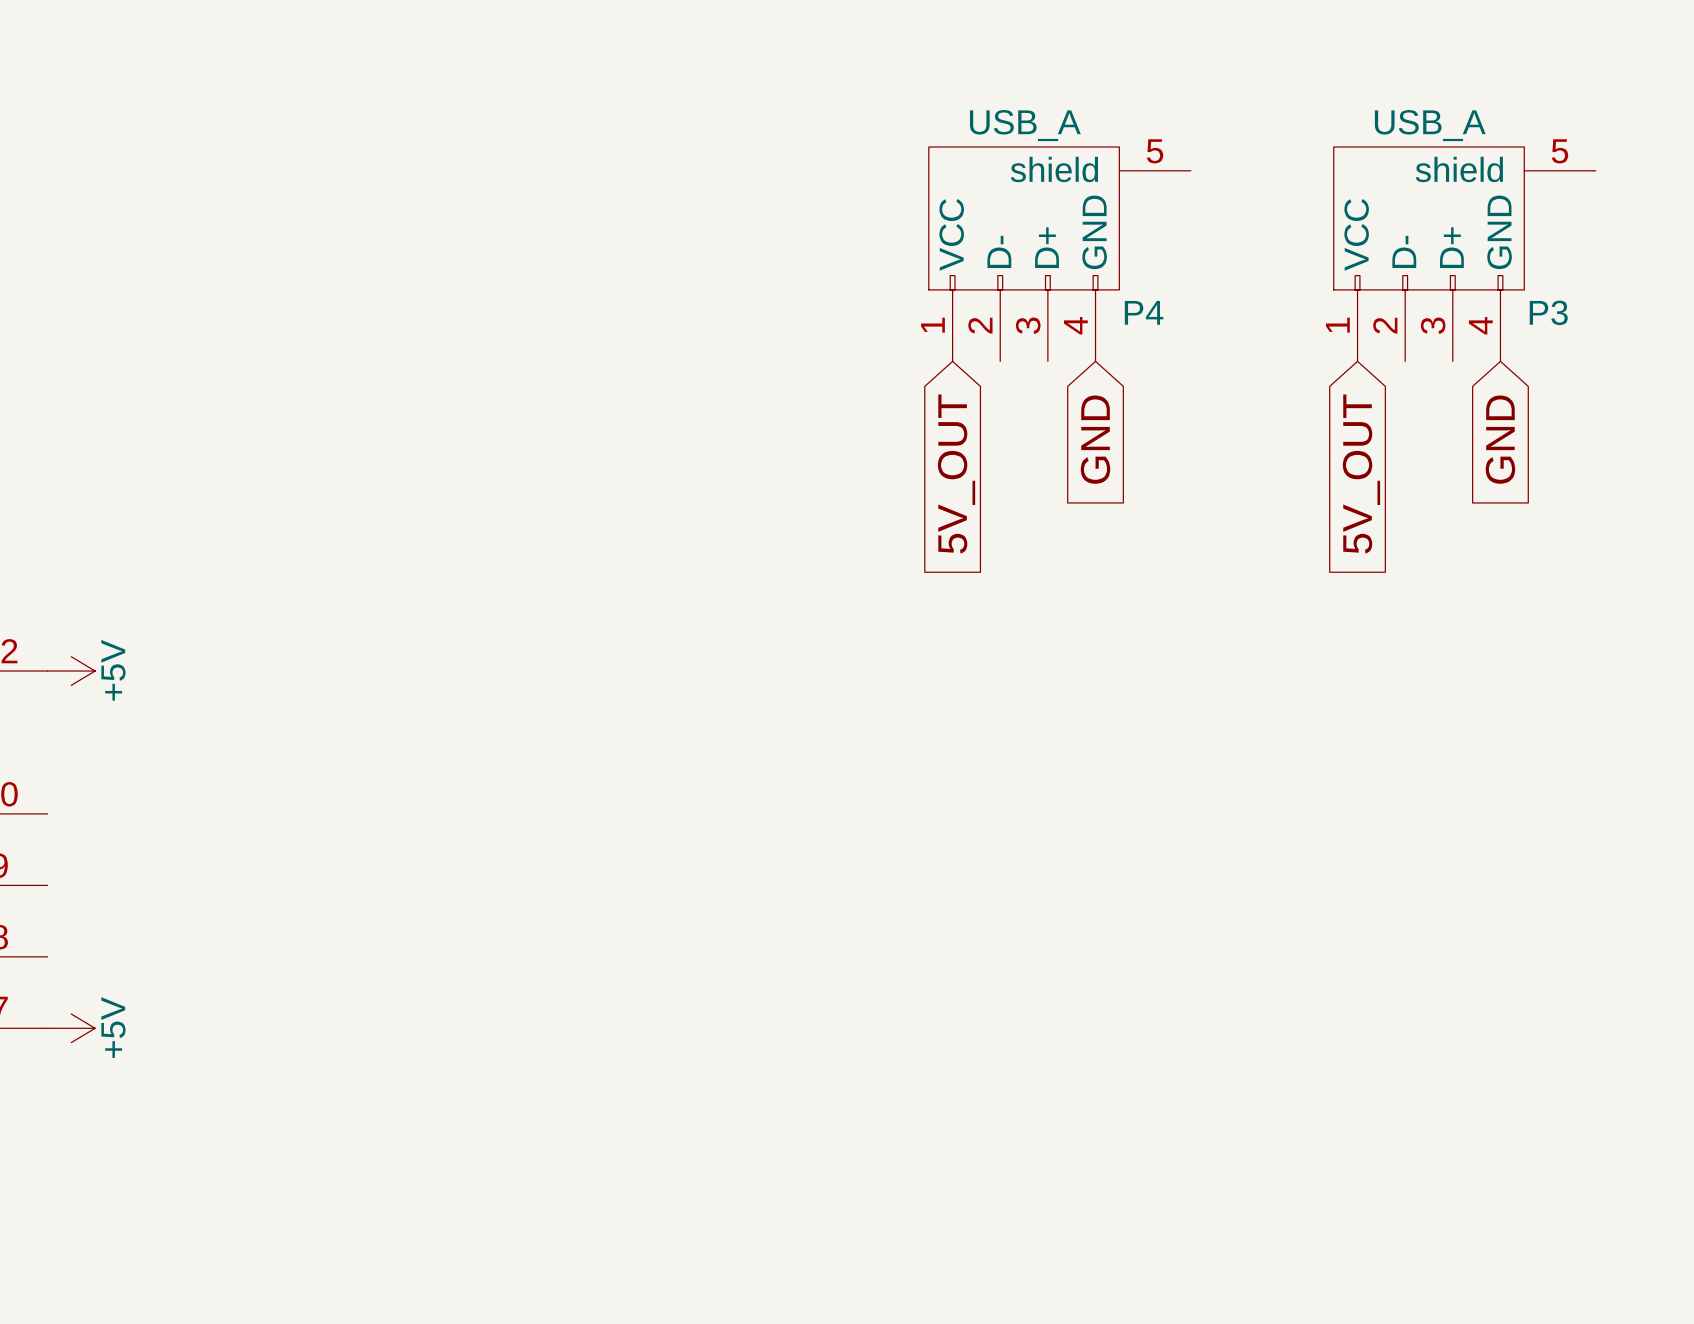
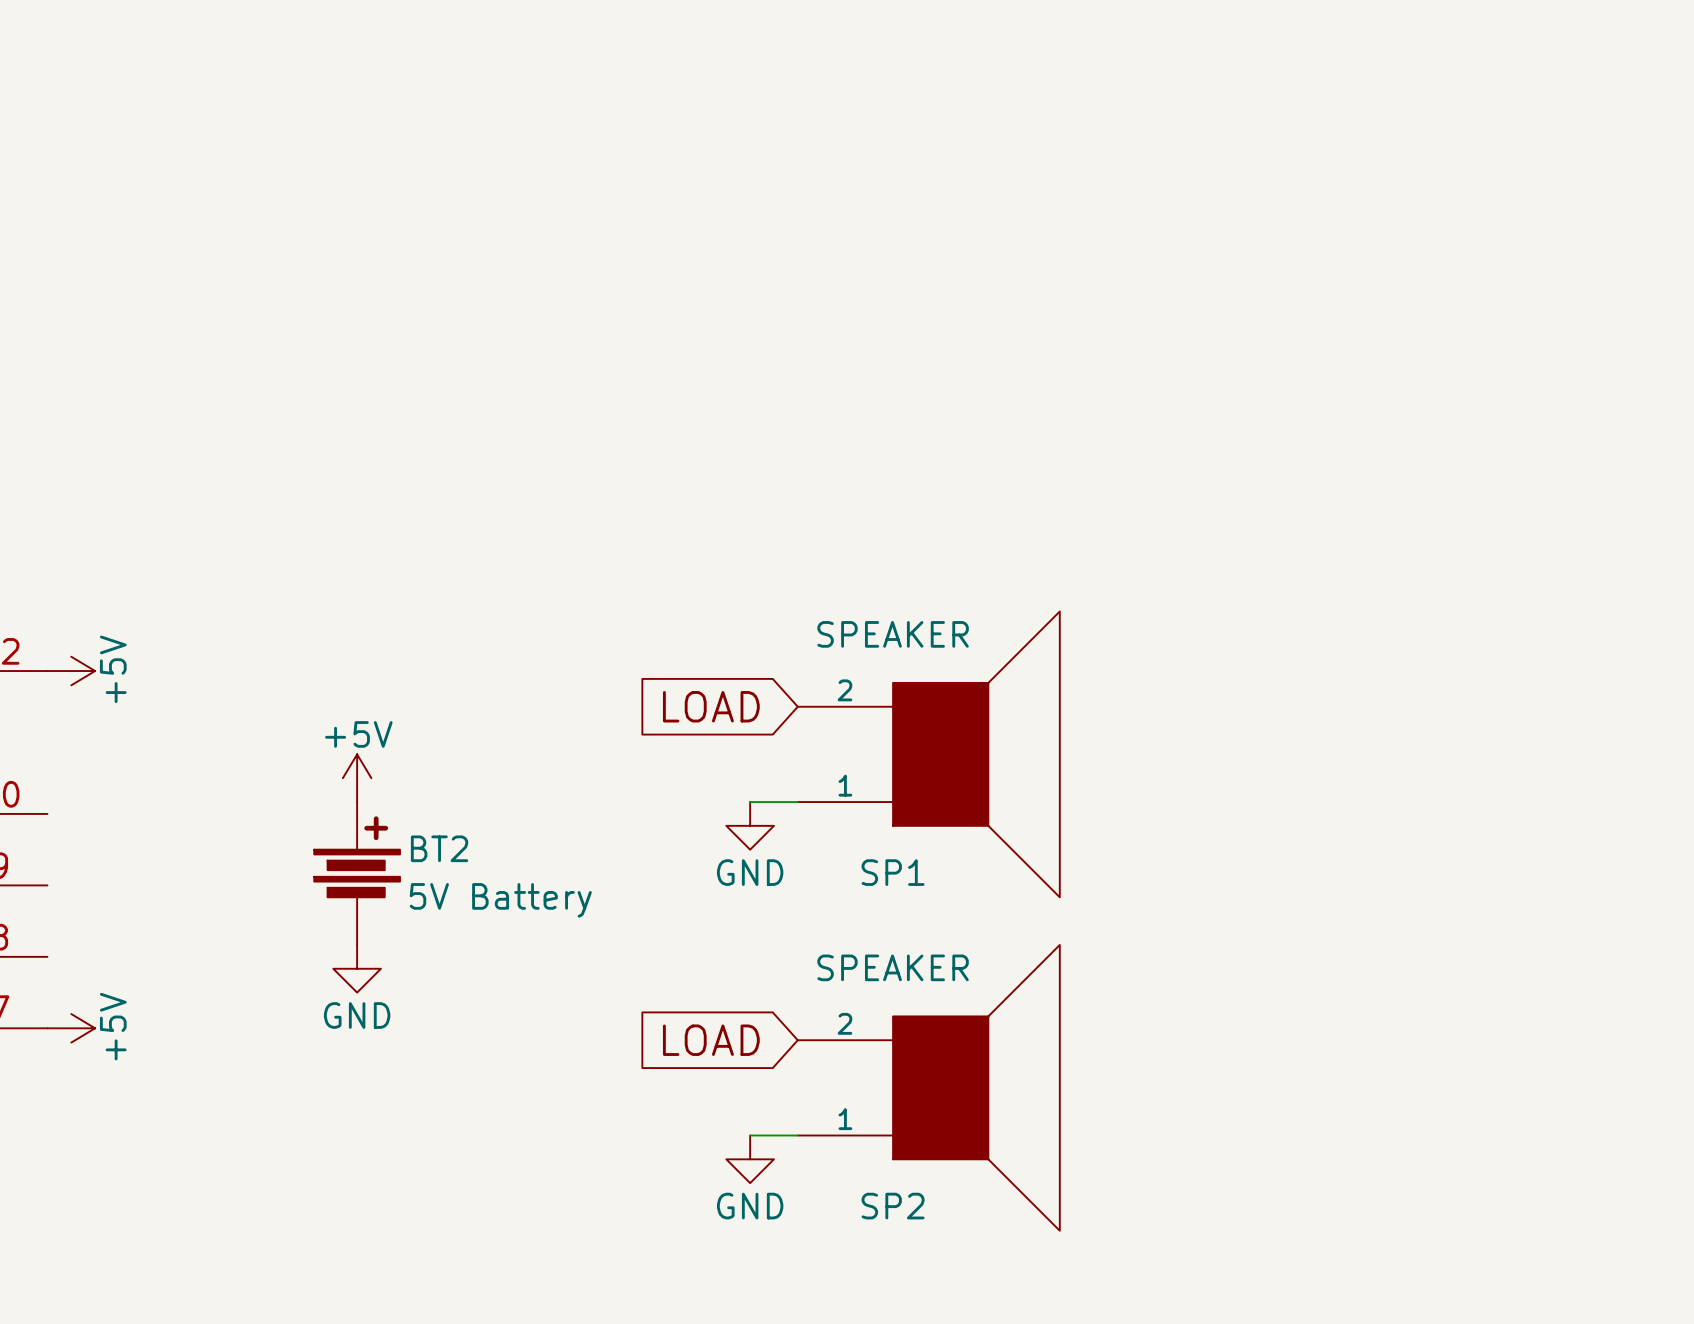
P4: USB_A (1059, 254) -> none
P3: USB_A (1464, 254) -> none
global label: GND (1095, 439) -> none
global label: GND (1500, 439) -> none
global label: 5V_OUT (956, 473) -> none
global label: 5V_OUT (1361, 473) -> none
global label: none -> LOAD (711, 706)
SP1: none -> SPEAKER (928, 754)
power symbol: none -> +5V (357, 778)
wire: none -> (750, 802) (797, 802)
power symbol: none -> GND (750, 825)
BT2: none -> 5V Battery (357, 873)
power symbol: none -> GND (357, 968)
global label: none -> LOAD (711, 1040)
SP2: none -> SPEAKER (928, 1087)
wire: none -> (750, 1135) (797, 1135)
power symbol: none -> GND (750, 1159)

